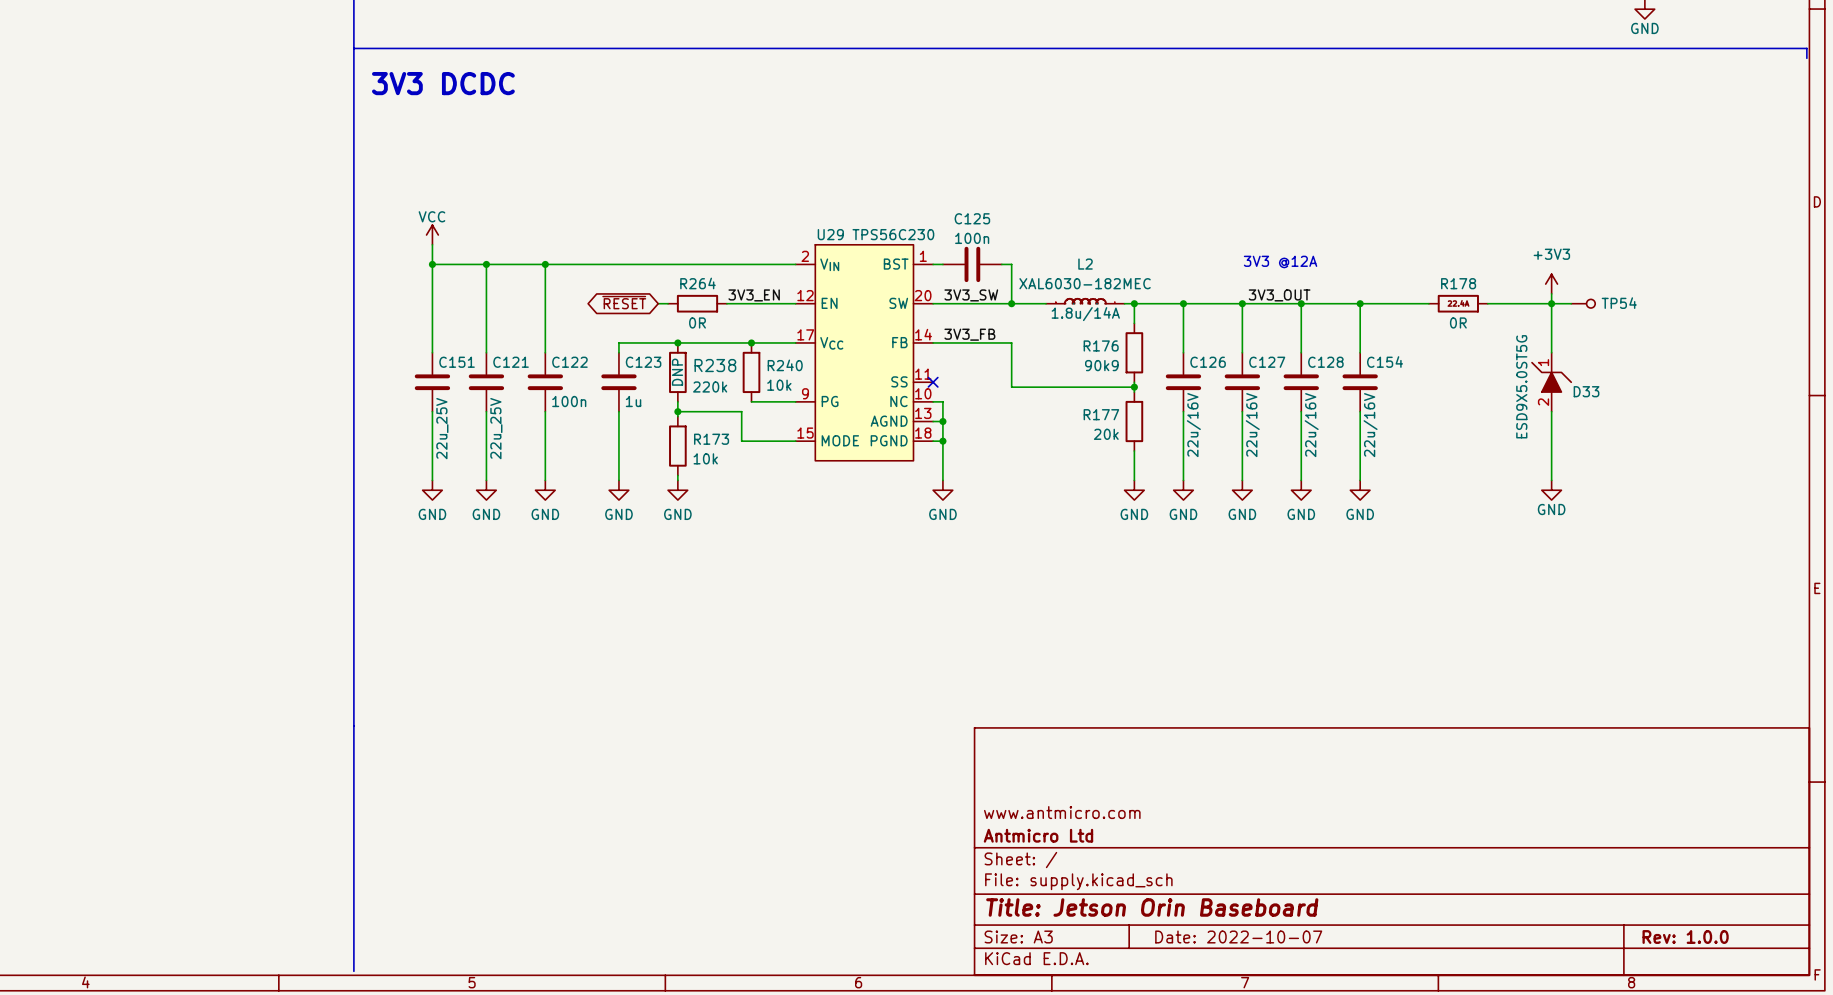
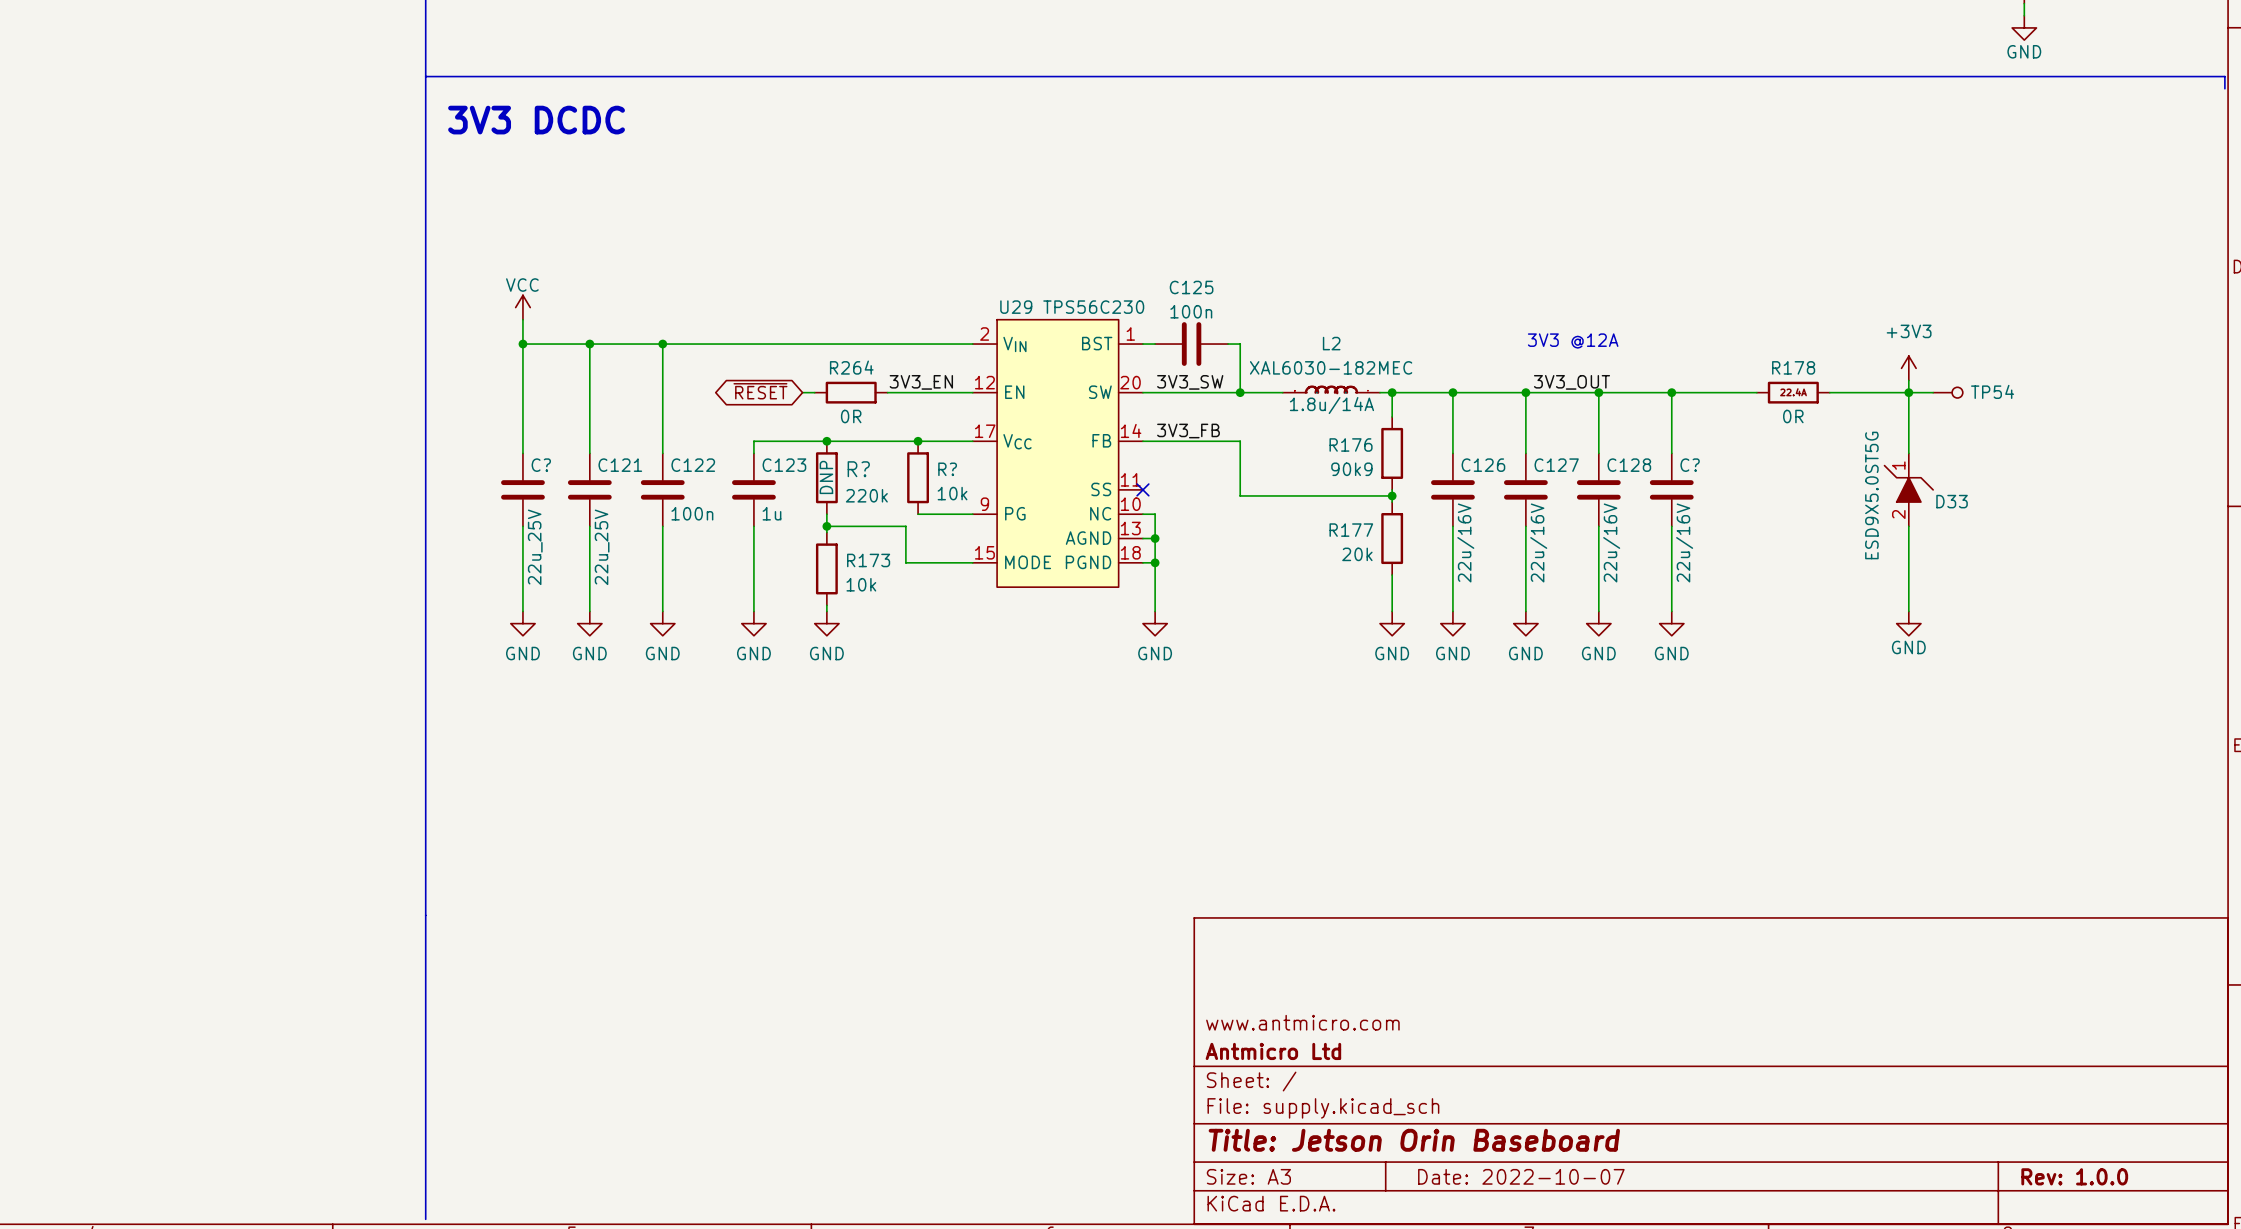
C151 name: C151 (457, 362) -> C? (541, 465)
C154 name: C154 (1385, 362) -> C? (1690, 465)
R238 name: R238 (715, 365) -> R? (858, 469)
R240 name: R240 (785, 365) -> R? (947, 469)

